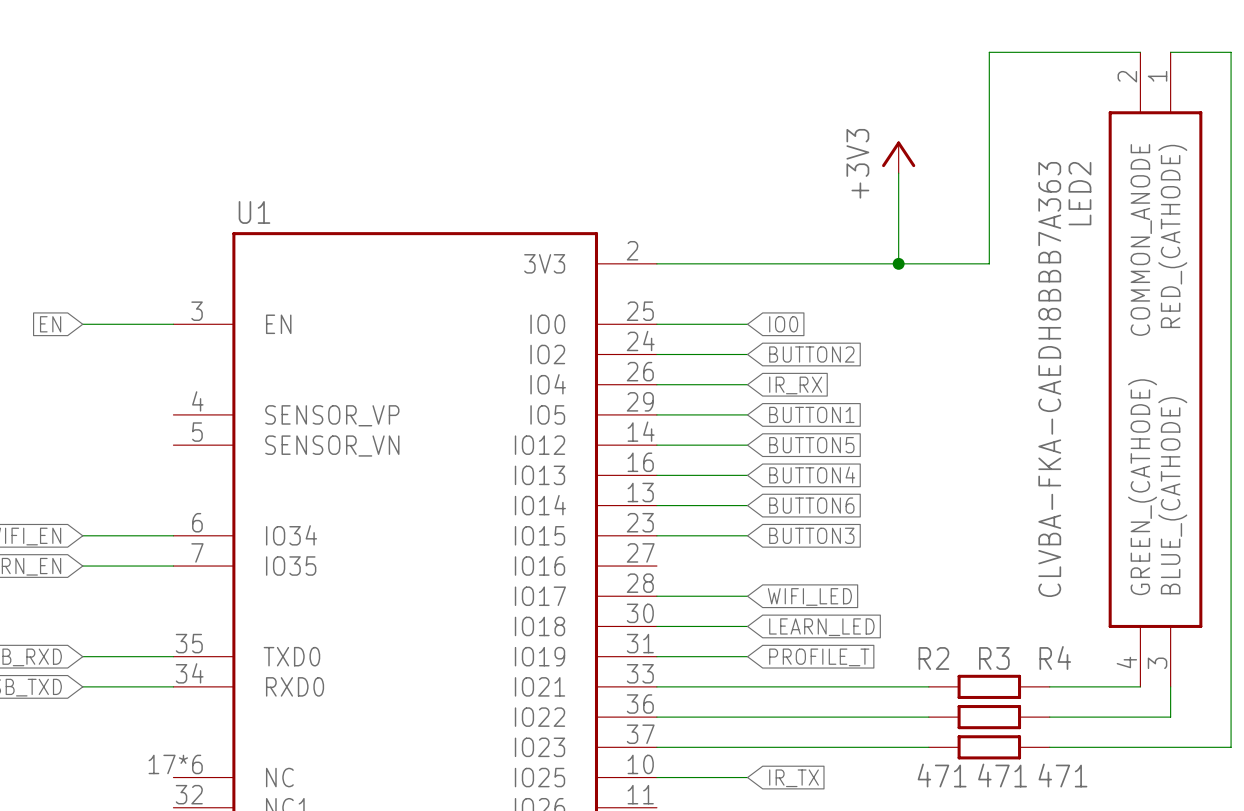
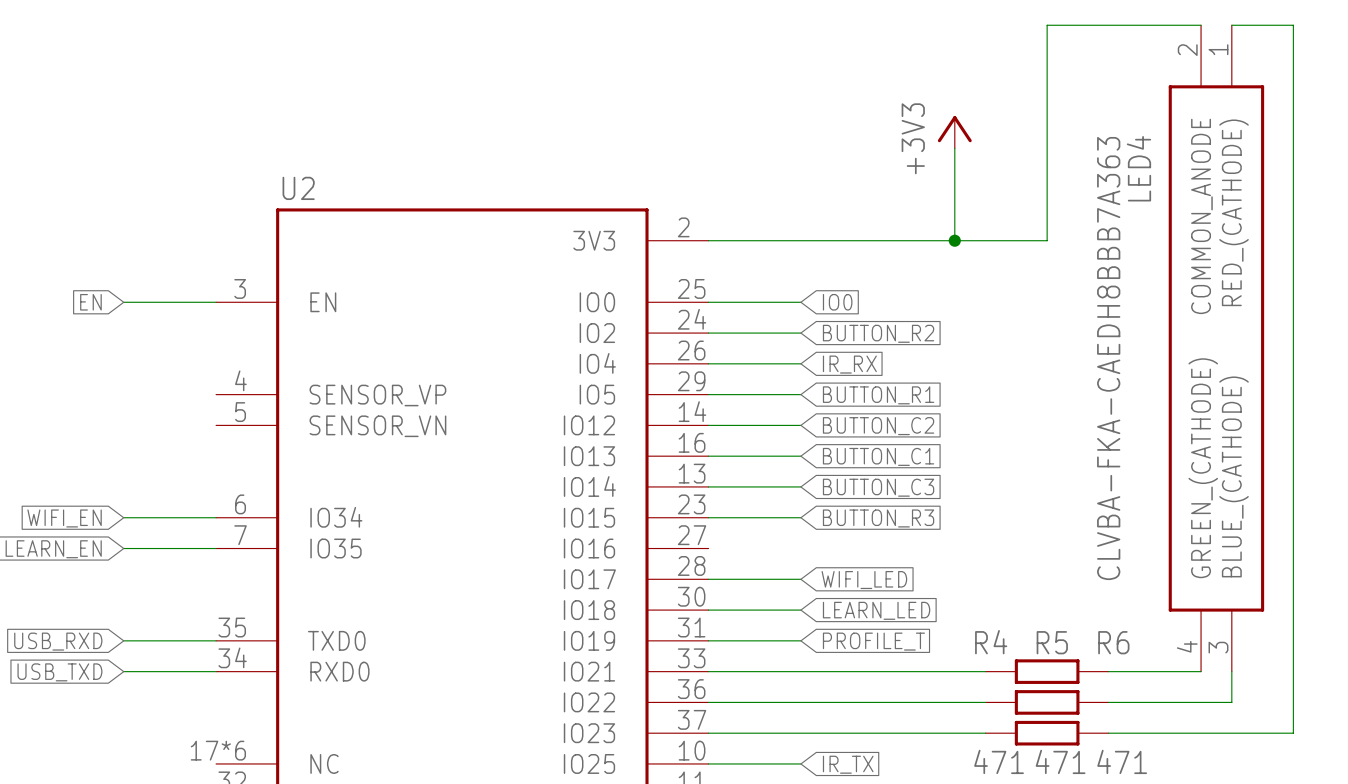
LED2 name: LED2 (1079, 193) -> LED4 (1138, 168)
U1 name: U1 (254, 212) -> U2 (298, 188)
global label: BUTTON2 (811, 354) -> BUTTON_R2 (878, 333)
global label: BUTTON1 (811, 414) -> BUTTON_R1 (878, 395)
global label: BUTTON5 (811, 445) -> BUTTON_C2 (878, 426)
global label: BUTTON4 (812, 475) -> BUTTON_C1 (878, 456)
global label: BUTTON6 (811, 505) -> BUTTON_C3 (878, 487)
global label: BUTTON3 (811, 535) -> BUTTON_R3 (878, 518)
R4 name: R4 (1055, 657) -> R6 (1113, 642)
R2 name: R2 (933, 658) -> R4 (991, 642)
R3 name: R3 (994, 658) -> R5 (1052, 642)

